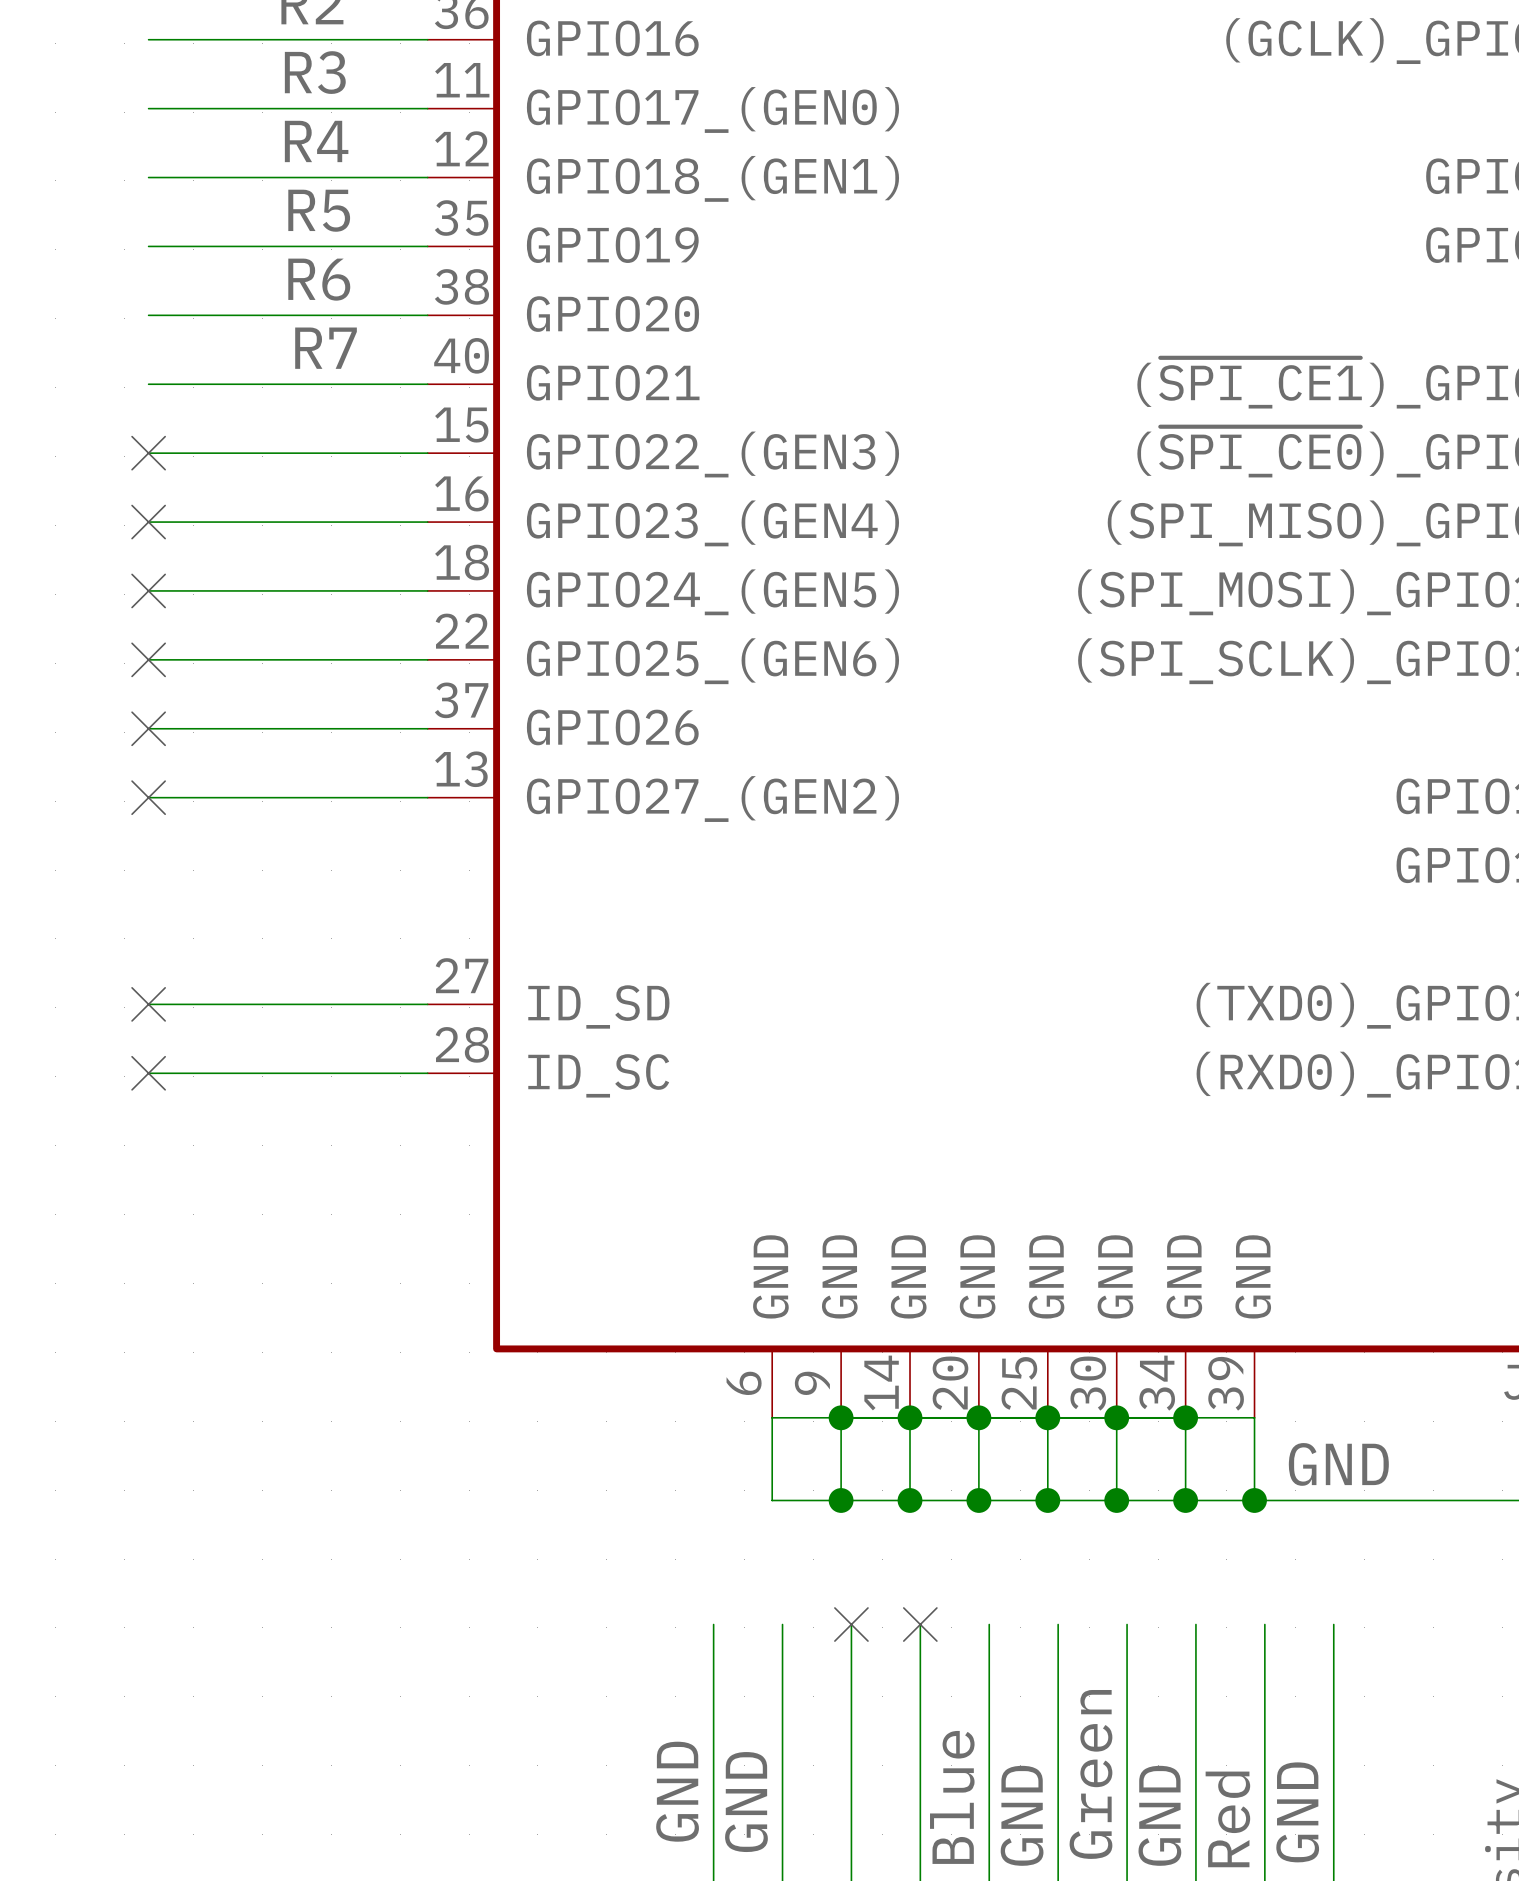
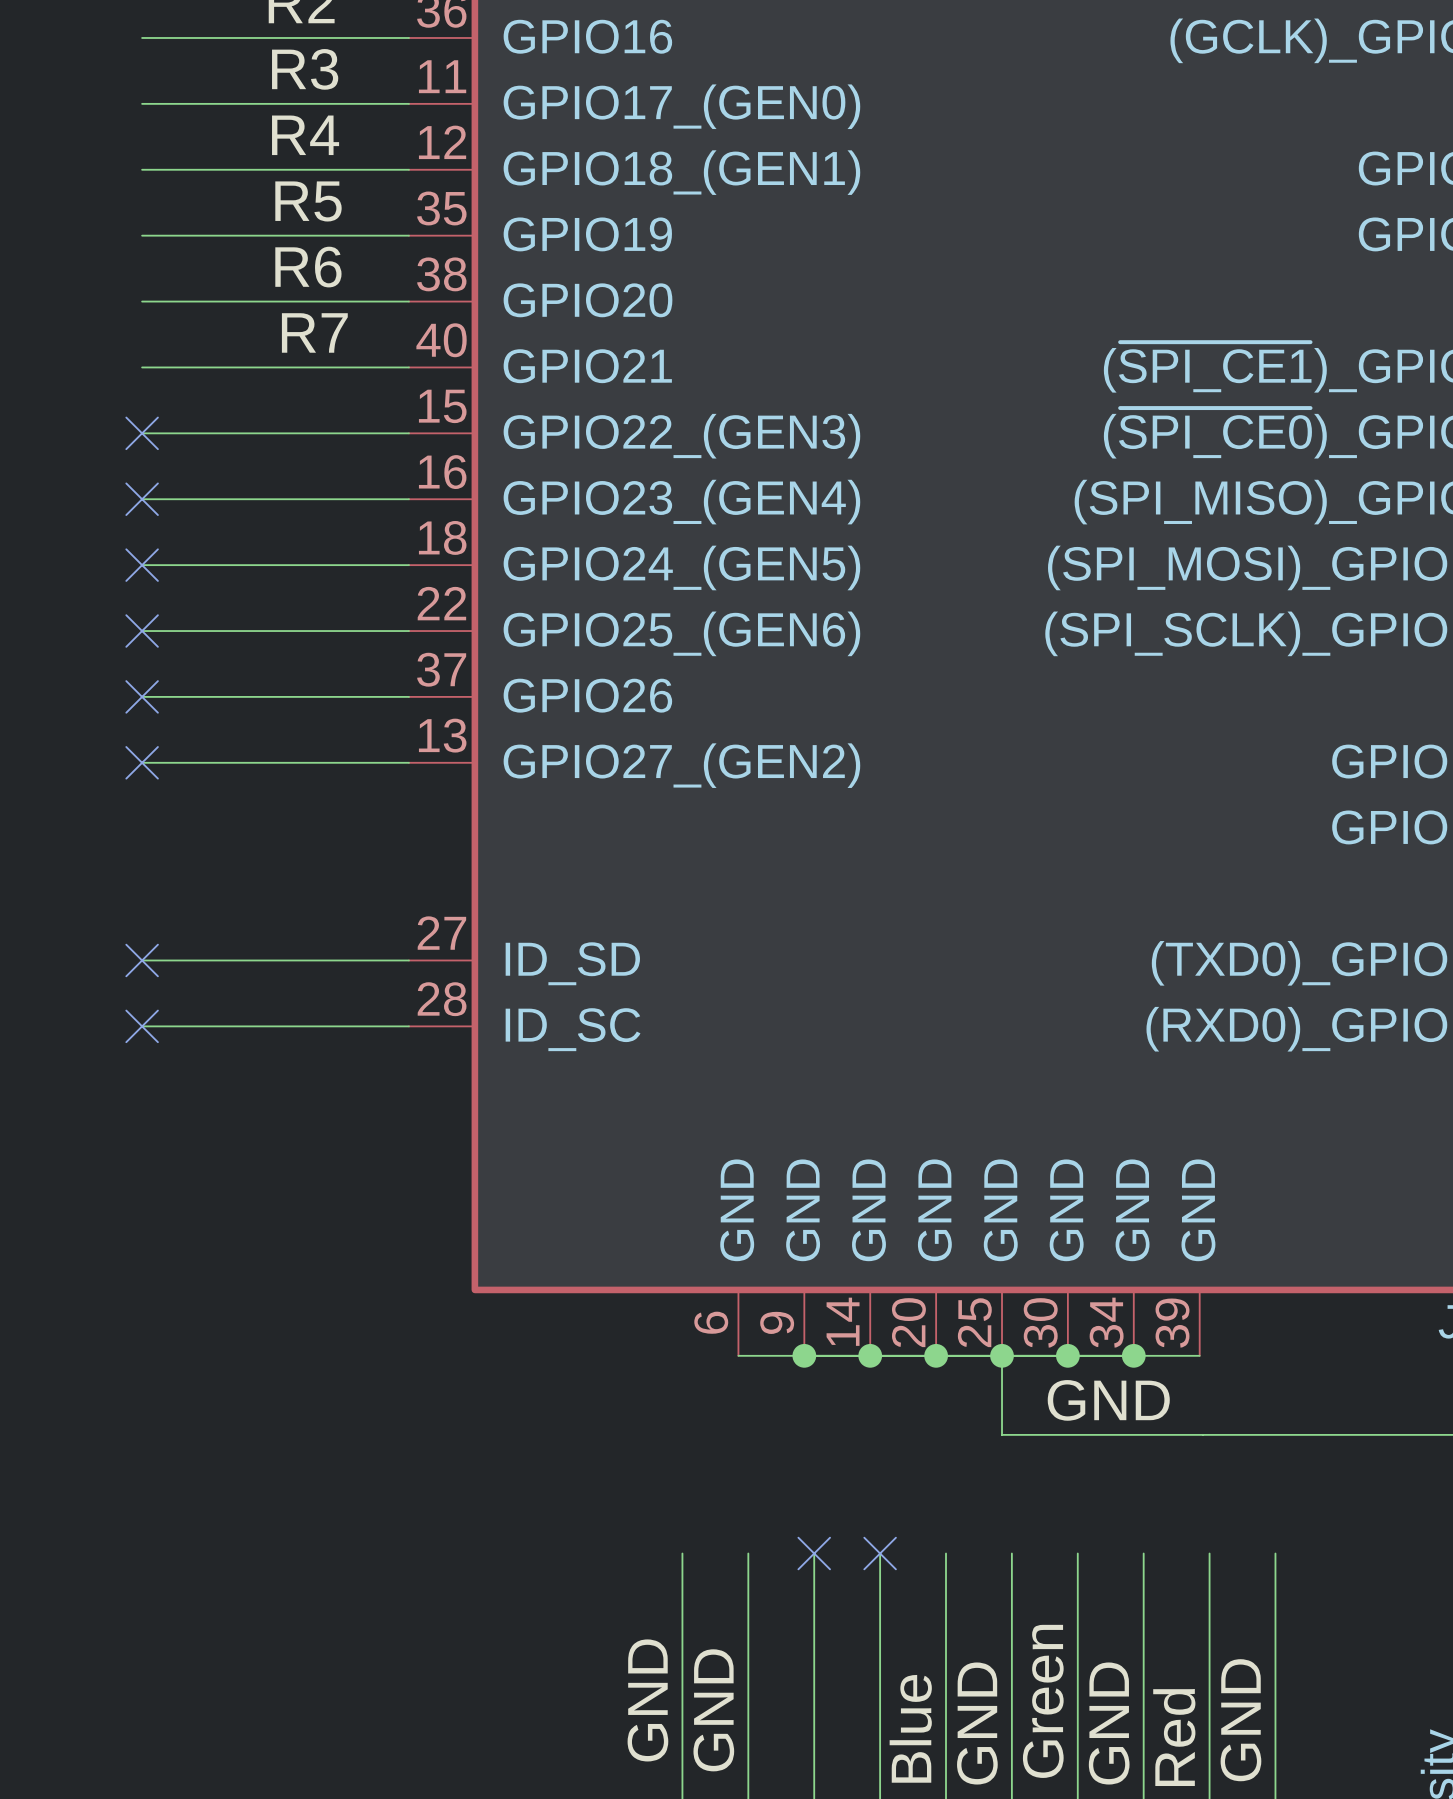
wire: (772, 1417) (772, 1500) (1047, 1500) -> none
wire: (841, 1417) (841, 1500) -> none
wire: (910, 1417) (910, 1500) -> none
wire: (978, 1417) (978, 1500) -> none
wire: (1116, 1417) (1116, 1500) -> none
wire: (1185, 1417) (1185, 1500) -> none
wire: (1254, 1417) (1254, 1500) -> none
label position: GND (1338, 1464) -> GND (1108, 1400)
junction: (841, 1500) -> none
junction: (910, 1500) -> none
junction: (978, 1500) -> none
junction: (1047, 1500) -> none
junction: (1116, 1500) -> none
junction: (1185, 1500) -> none
junction: (1254, 1500) -> none

